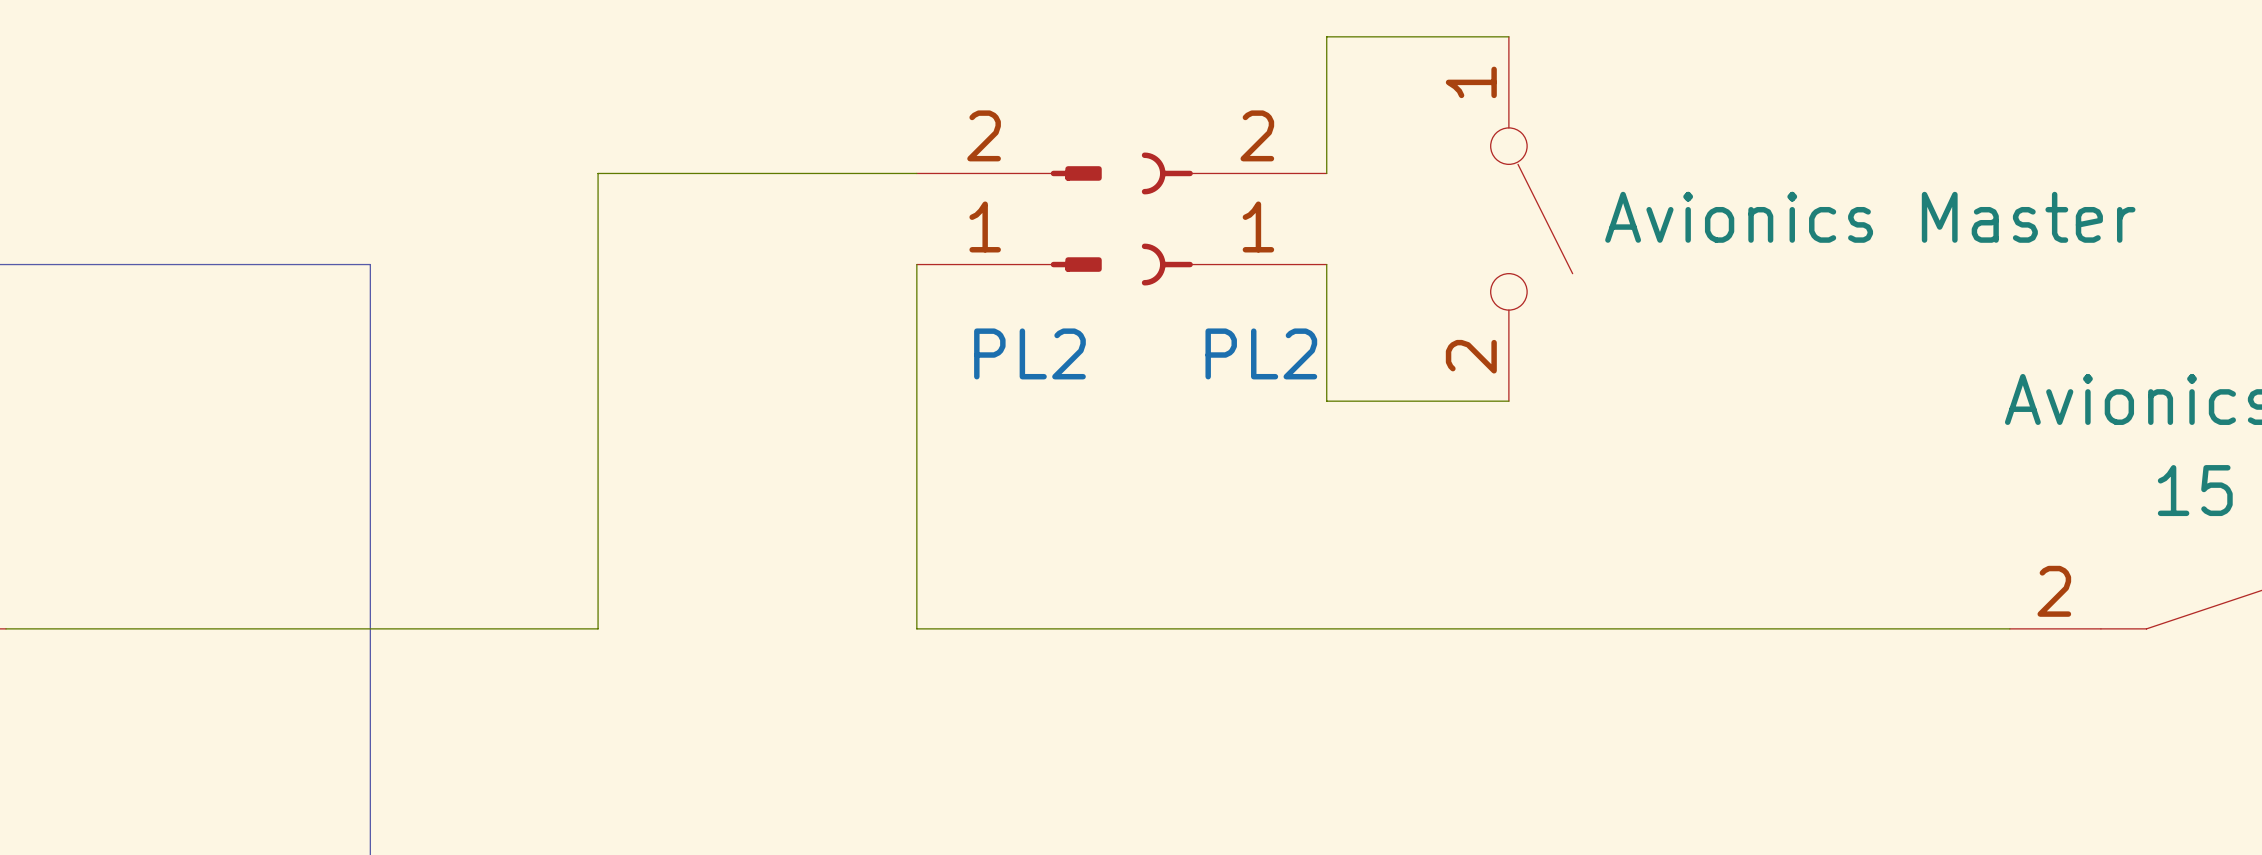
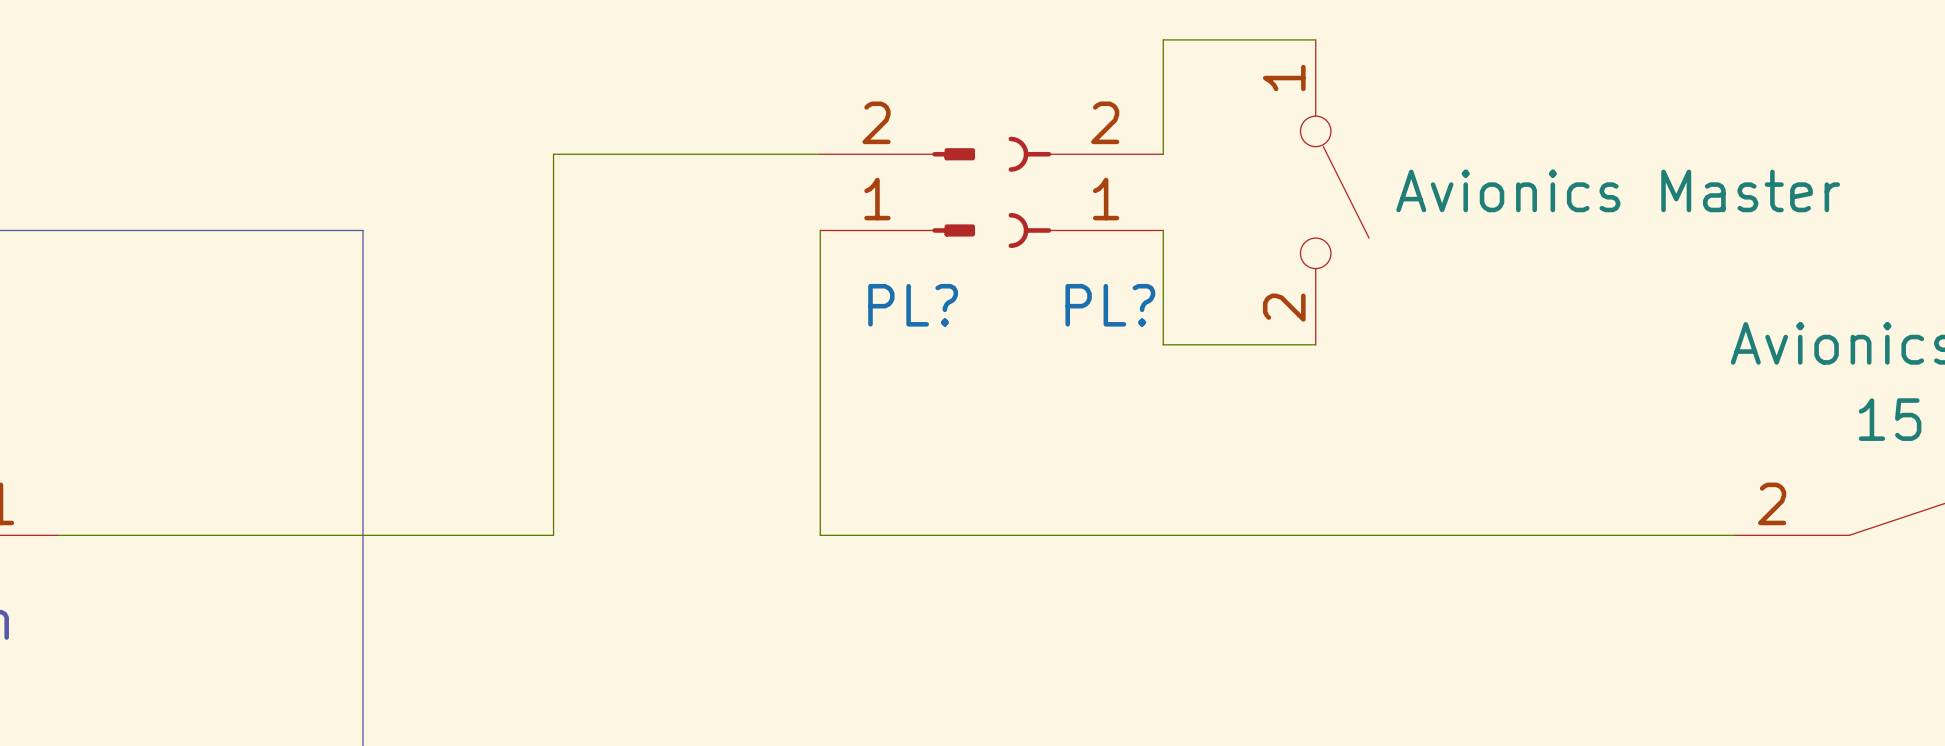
PL2 name: PL2 (1029, 353) -> PL? (913, 305)
PL2 name: PL2 (1261, 353) -> PL? (1110, 305)

